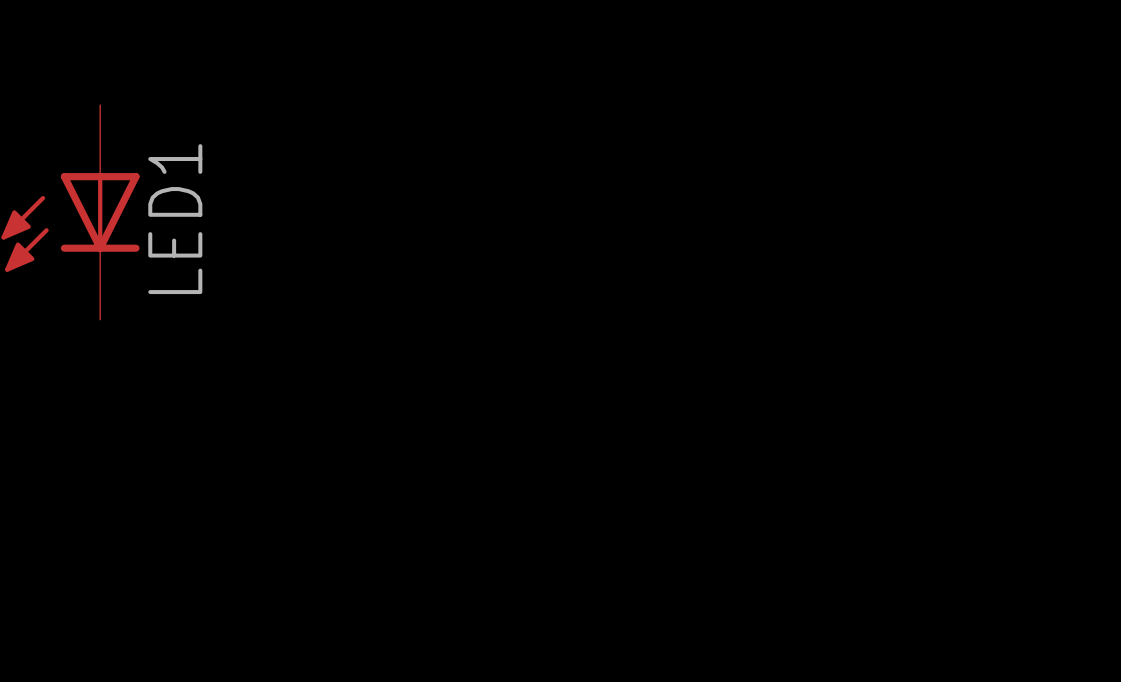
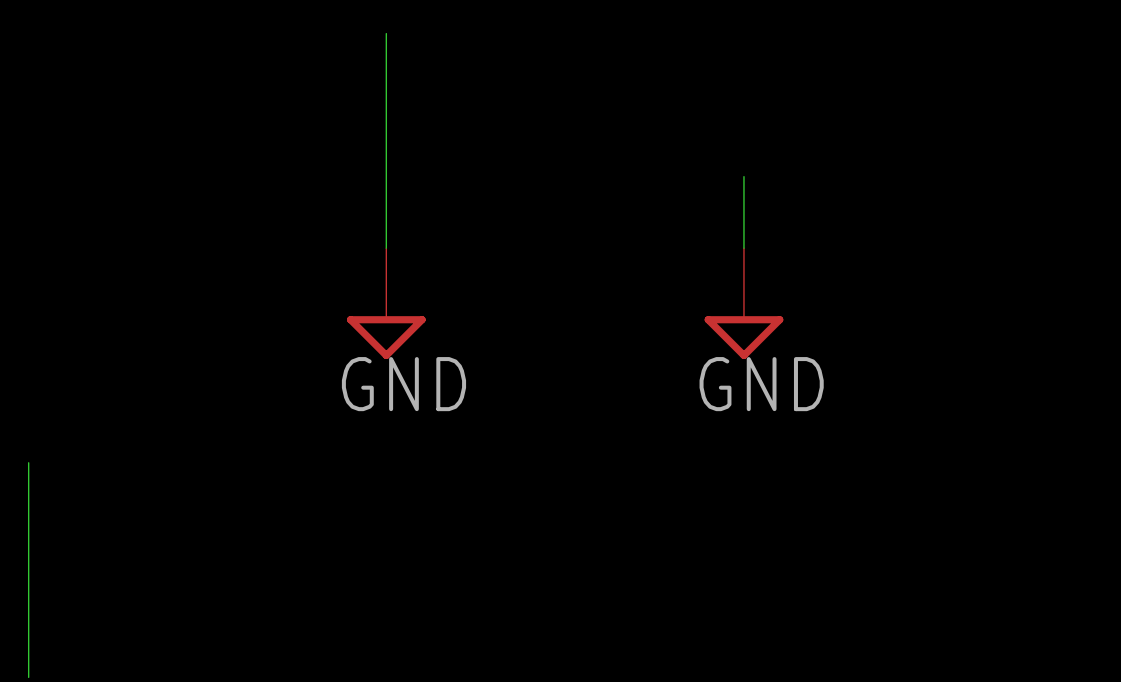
wire: none -> (386, 33) (386, 248)
wire: none -> (743, 176) (743, 248)
LED1: (70, 212) -> none
power symbol: none -> GND (386, 303)
power symbol: none -> GND (743, 303)
wire: none -> (28, 462) (28, 677)

